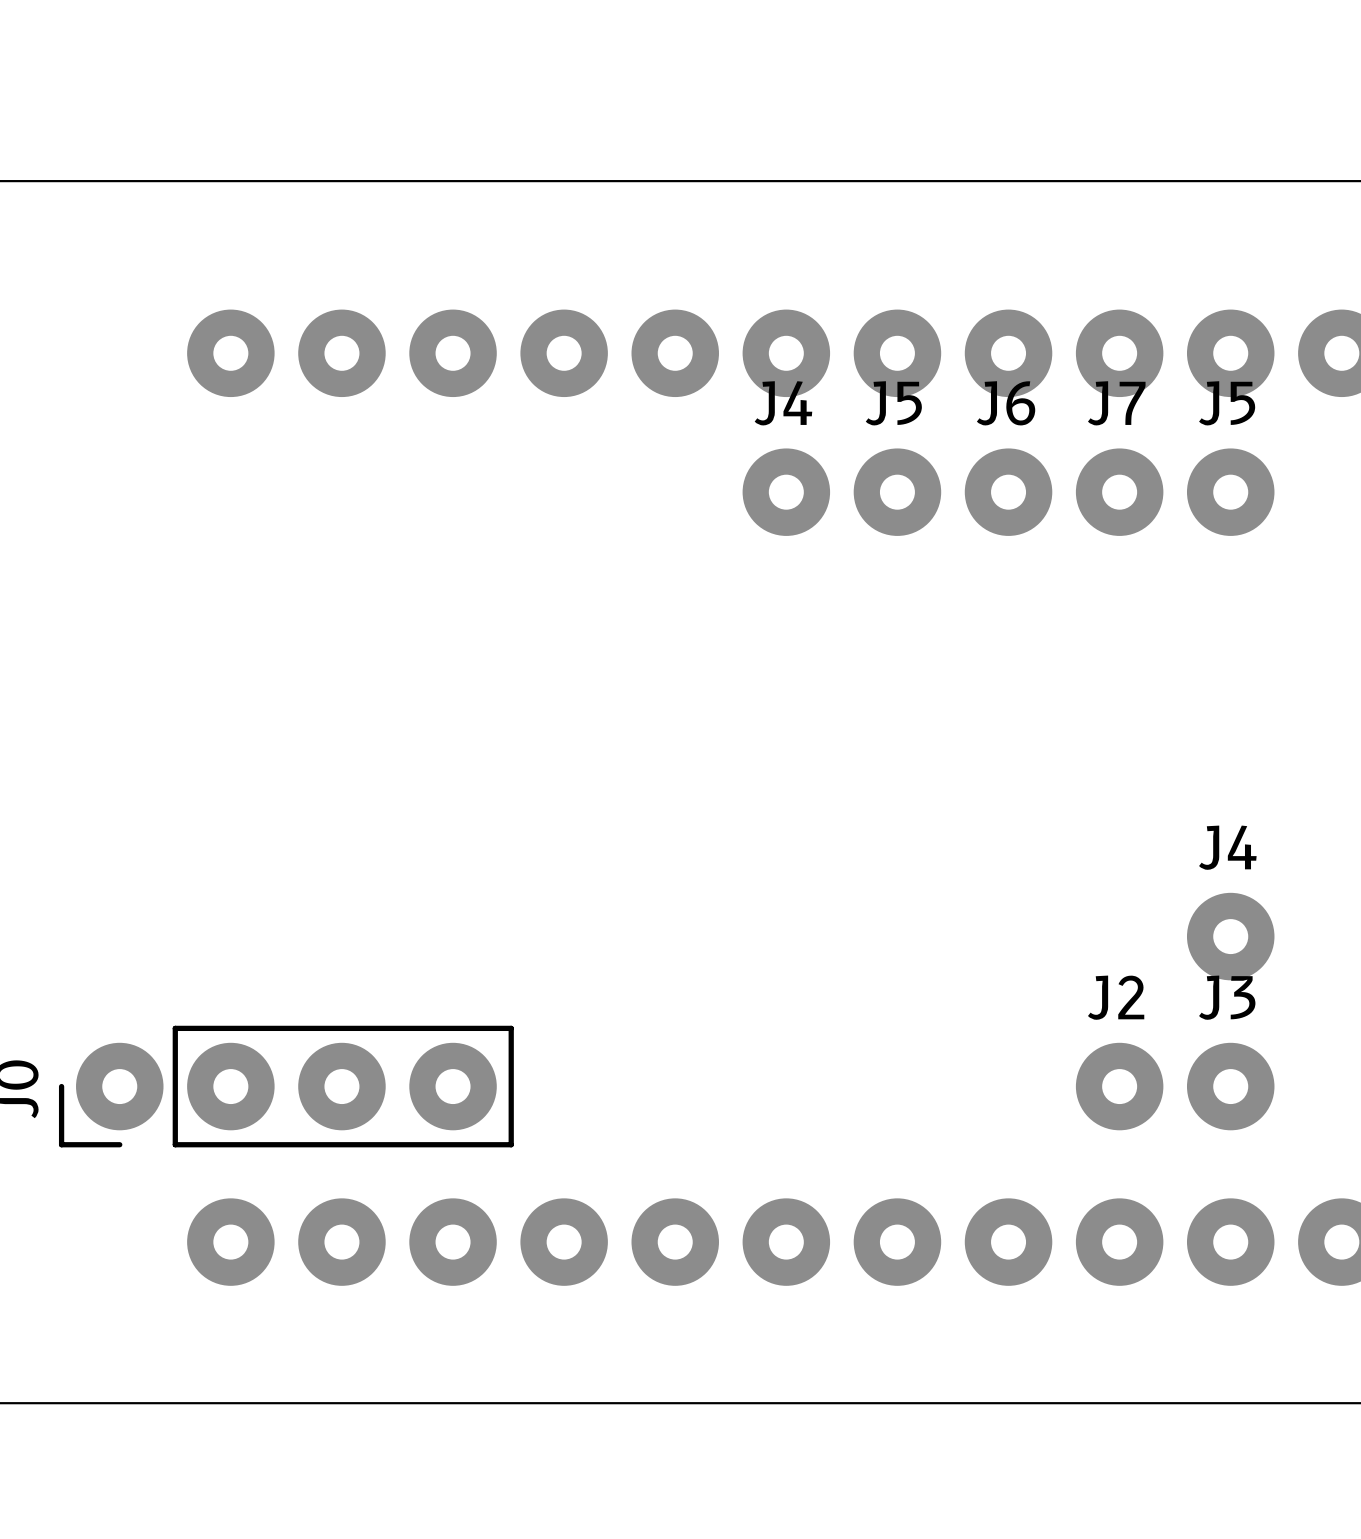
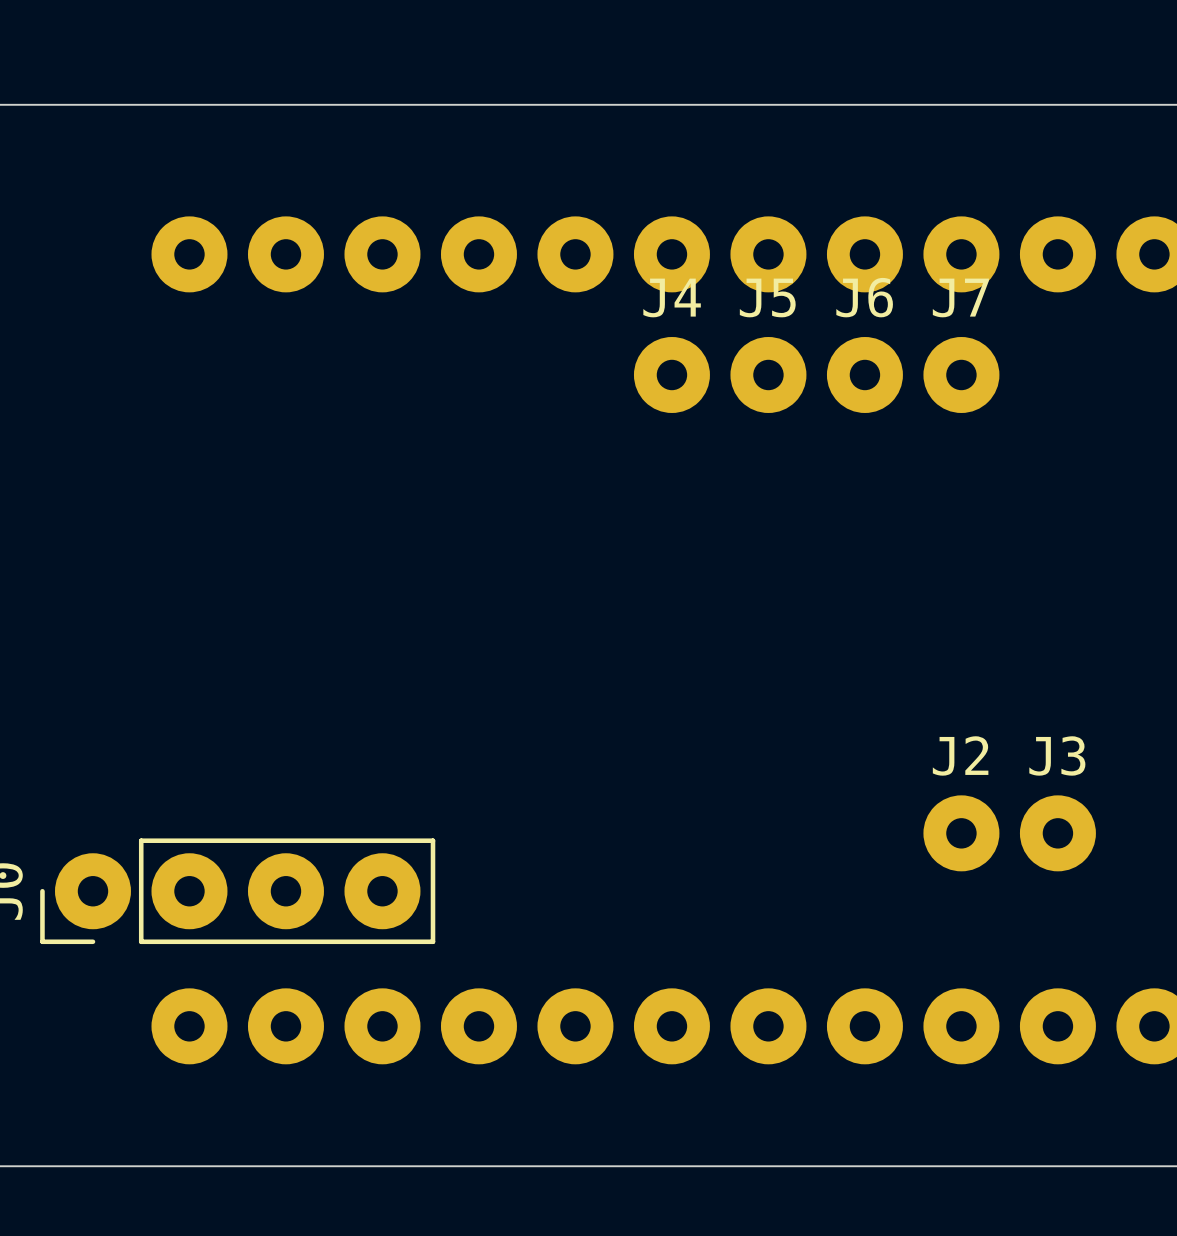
J5: (1230, 492) -> none
J4: (1230, 936) -> none
J2 position: (1119, 1086) -> (961, 833)
J3 position: (1230, 1086) -> (1057, 833)

